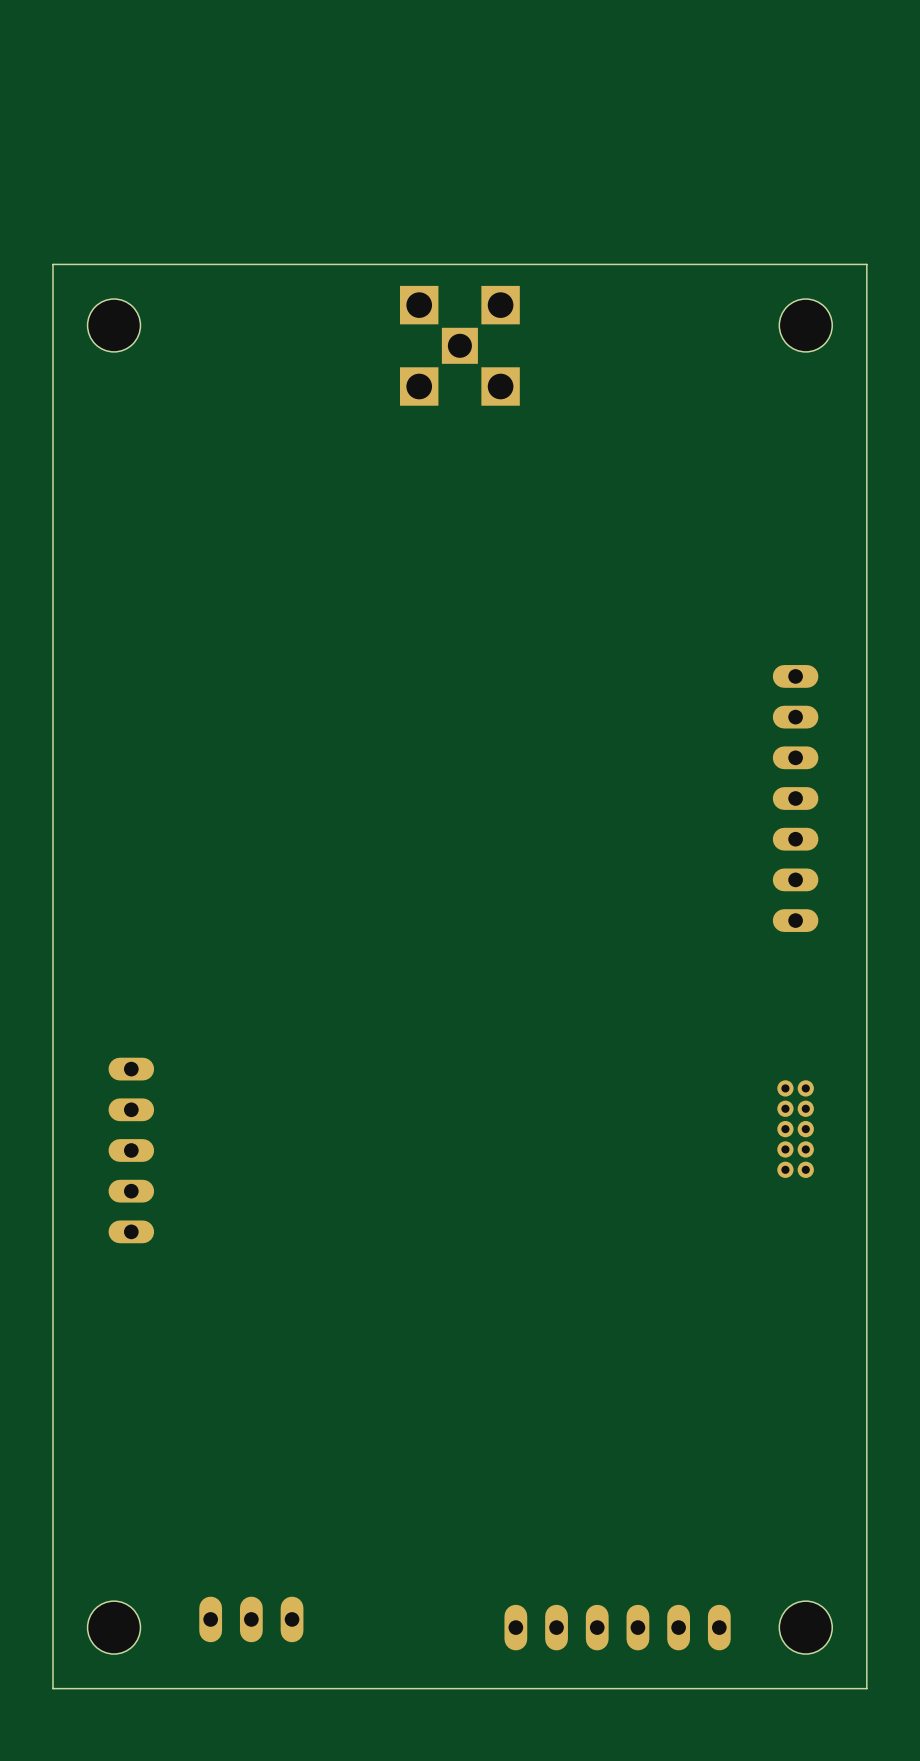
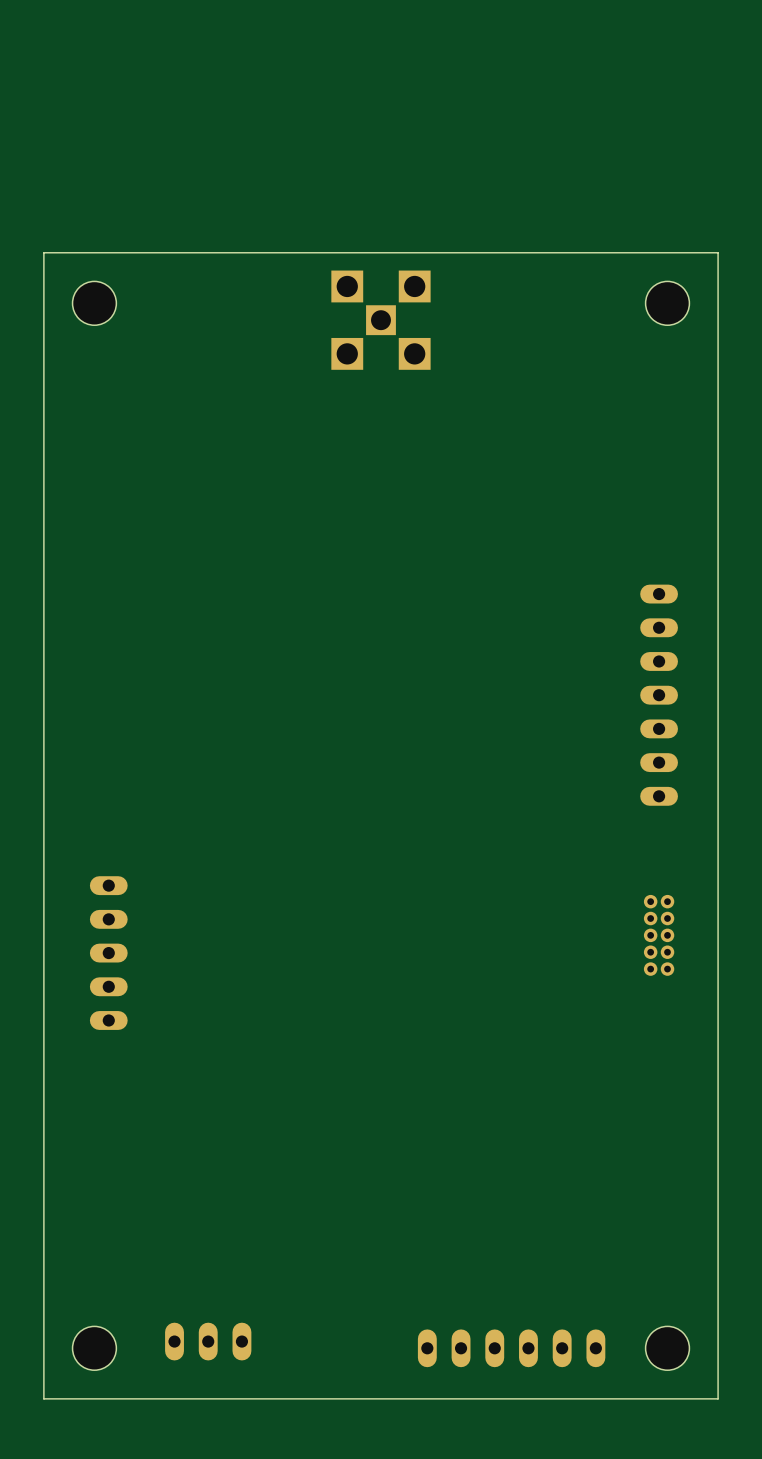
board edge: (866, 305) (866, 264) (52, 264) (52, 305) -> (718, 252) (43, 252)
part position: (114, 325) -> (94, 303)
part position: (805, 325) -> (667, 303)
part position: (459, 345) -> (380, 320)
part position: (795, 798) -> (659, 695)

